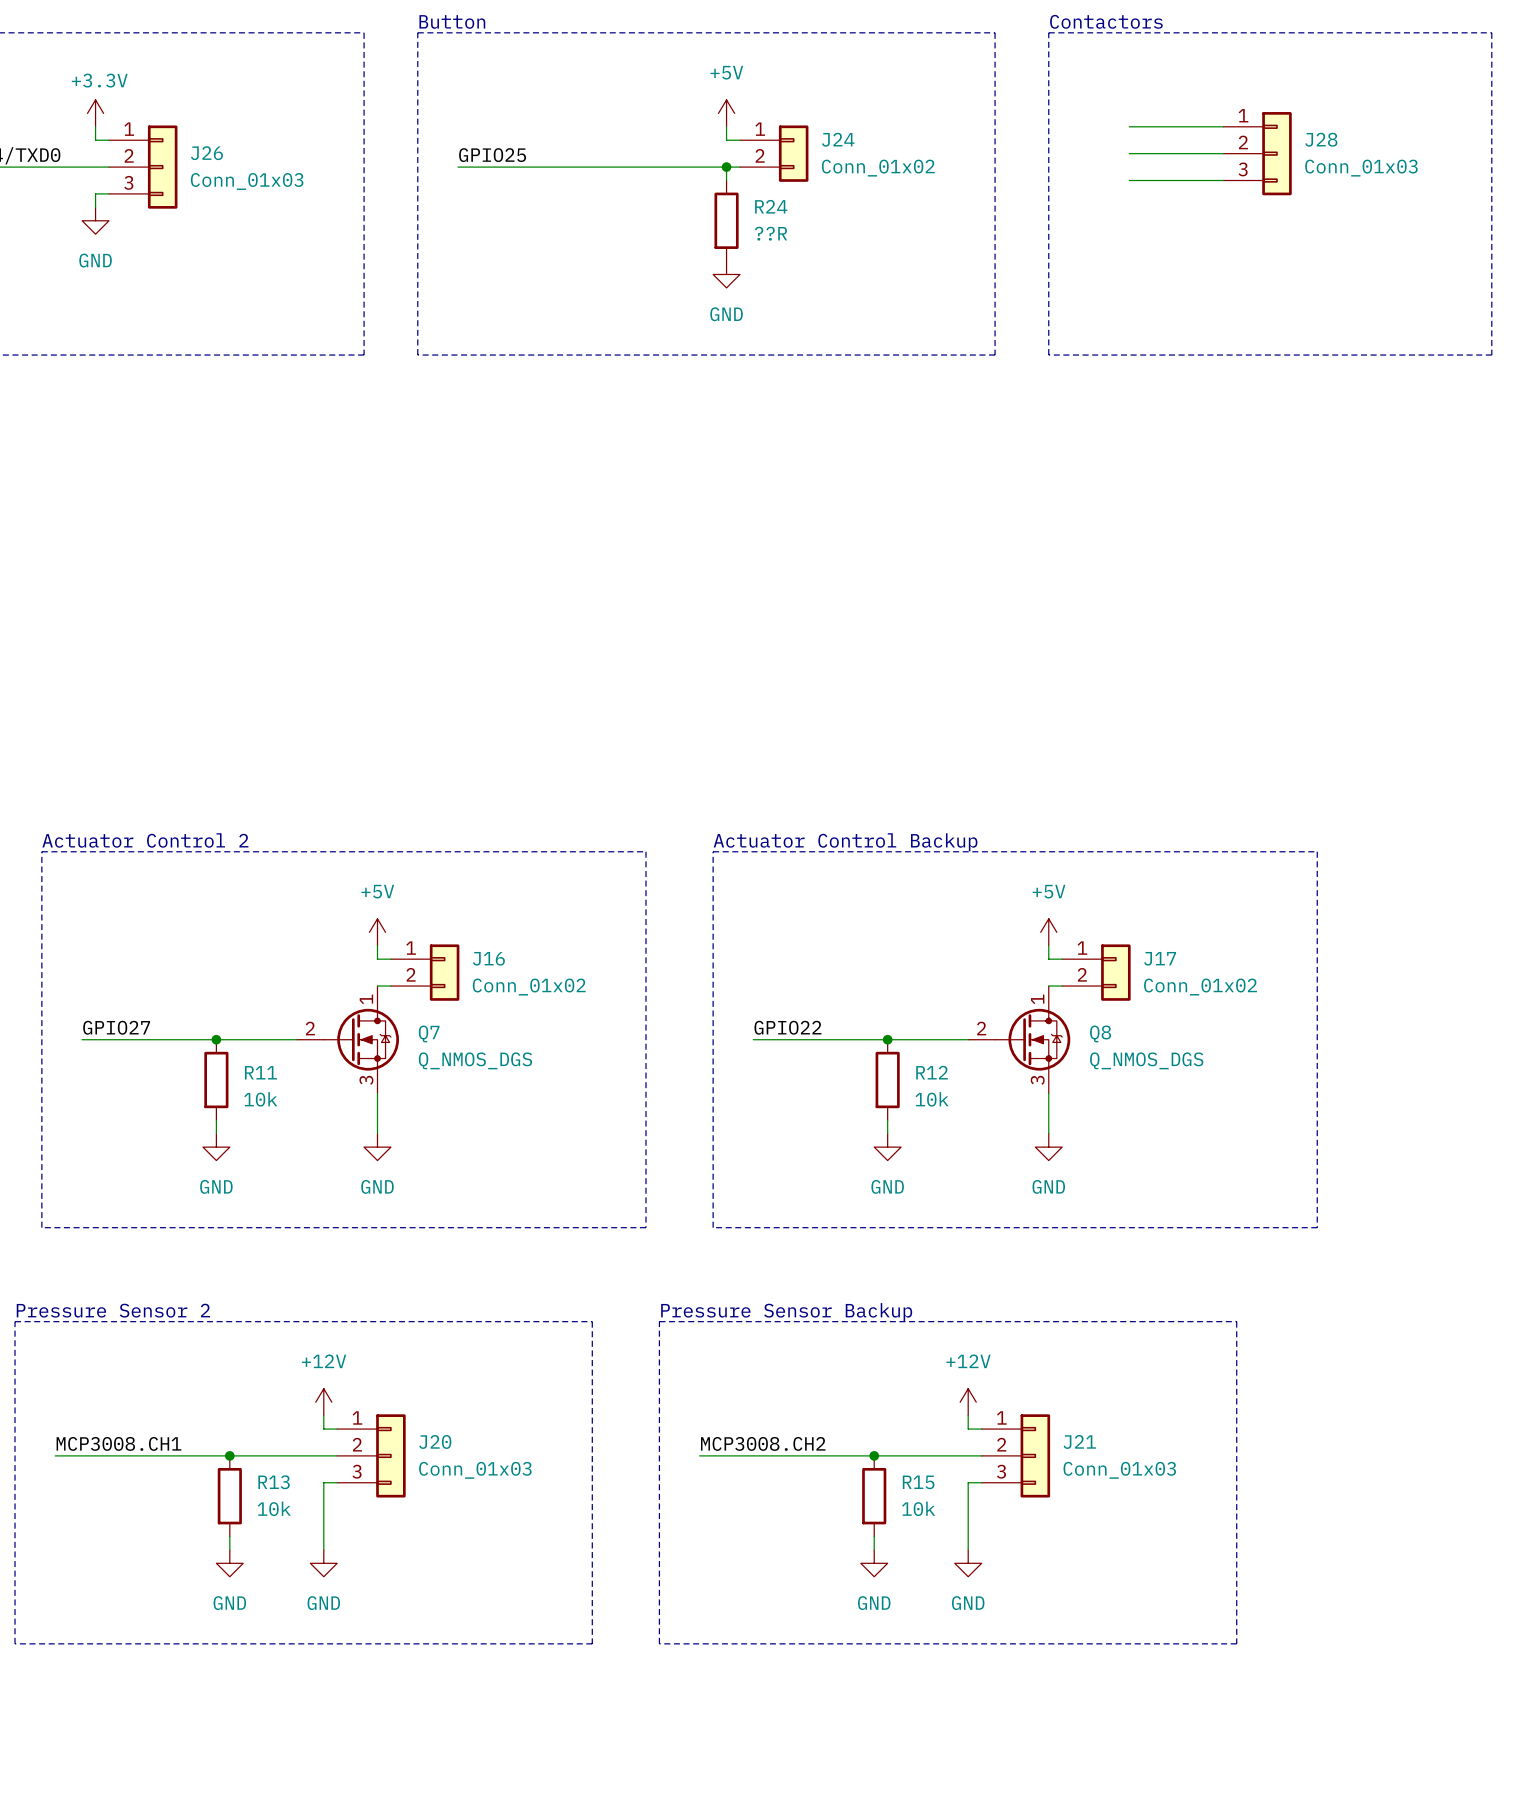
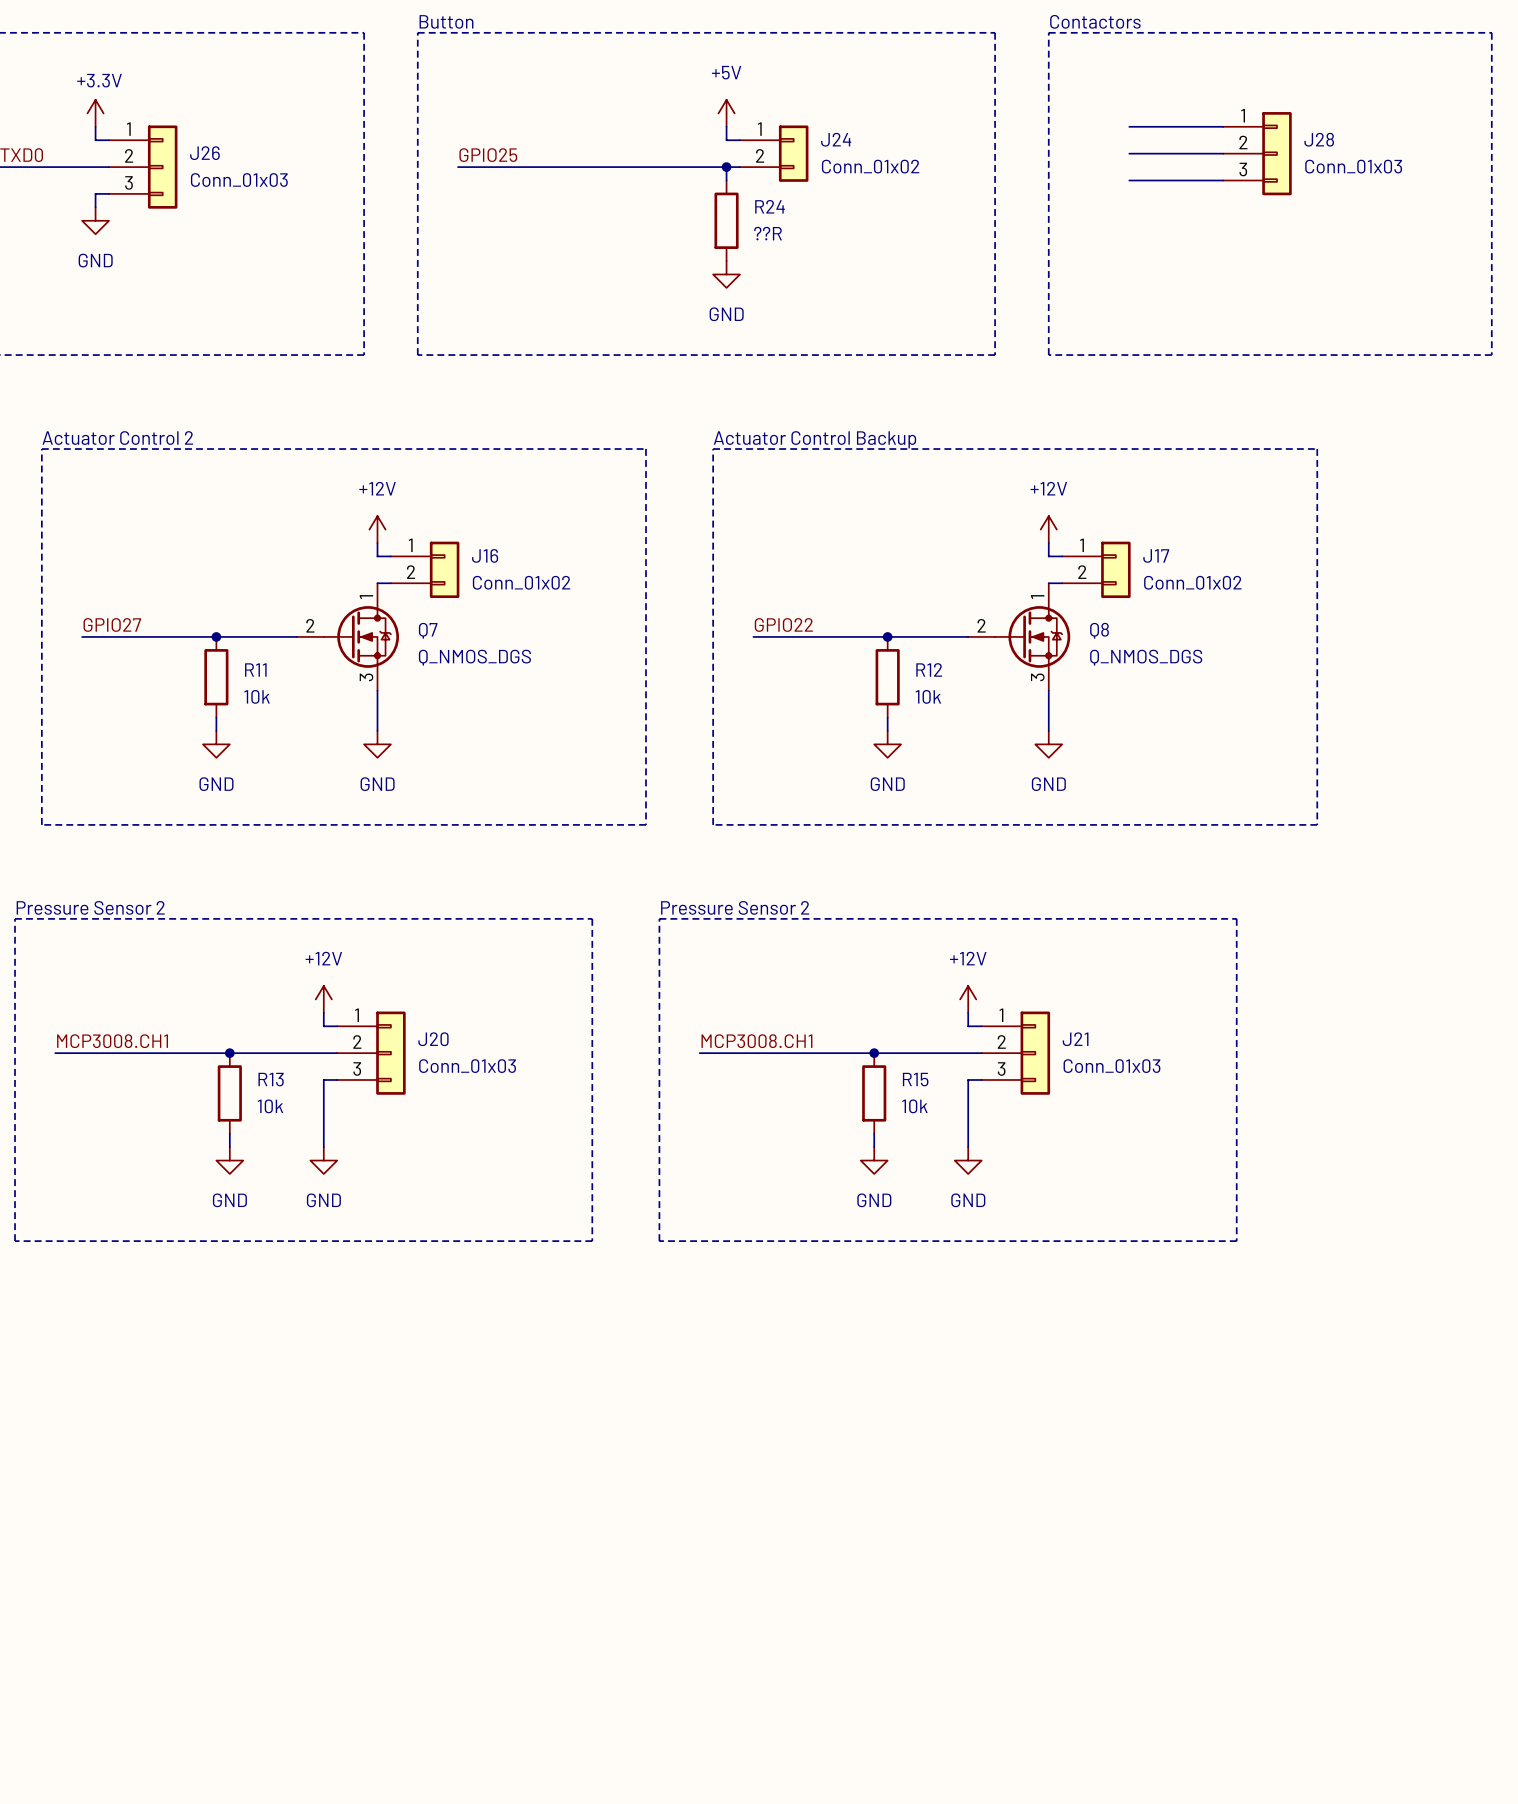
text: none -> Actuator Control 2 (117, 438)
text: none -> Actuator Control Backup (814, 439)
line: none -> (41, 449) (646, 449) (646, 824) (41, 824) (41, 449)
line: none -> (713, 449) (1317, 449) (1317, 824) (713, 824) (713, 449)
power symbol: none -> +12V (377, 529)
power symbol: none -> +12V (1048, 529)
wire: none -> (377, 542) (377, 556) (390, 556)
wire: none -> (1048, 542) (1048, 556) (1062, 556)
wire: none -> (377, 583) (390, 583)
wire: none -> (1048, 583) (1062, 583)
label: none -> GPIO27 (112, 624)
label: none -> GPIO22 (783, 624)
wire: none -> (82, 636) (296, 636)
junction: none -> (216, 636)
wire: none -> (753, 636) (968, 636)
junction: none -> (887, 636)
wire: none -> (377, 690) (377, 730)
wire: none -> (1048, 690) (1048, 730)
wire: none -> (216, 717) (216, 730)
wire: none -> (887, 717) (887, 730)
power symbol: none -> GND (216, 744)
power symbol: none -> GND (377, 744)
power symbol: none -> GND (887, 744)
power symbol: none -> GND (1048, 744)
text: Actuator Control 2 (145, 840) -> none
text: Actuator Control Backup (845, 842) -> none
line: (41, 851) (646, 851) (646, 1227) (41, 1227) (41, 851) -> (15, 918) (15, 1241) (592, 1241) (592, 918) (15, 918)
line: (713, 851) (1317, 851) (1317, 1227) (713, 1227) (713, 851) -> (659, 918) (659, 1241) (1236, 1241) (1236, 918) (659, 918)
text: none -> Pressure Sensor 2 (90, 907)
text: none -> Pressure Sensor 2 (735, 907)
power symbol: +5V (377, 932) -> none
power symbol: +5V (1048, 932) -> none
wire: (377, 945) (377, 959) (390, 959) -> (323, 1012) (323, 1026) (337, 1026)
wire: (1048, 945) (1048, 959) (1062, 959) -> (968, 1012) (968, 1026) (981, 1026)
J16 position: (425, 972) -> (425, 569)
J17 position: (1096, 972) -> (1096, 569)
wire: (377, 986) (390, 986) -> none
wire: (1048, 986) (1062, 986) -> none
power symbol: none -> +12V (323, 999)
power symbol: none -> +12V (968, 999)
label: GPIO27 (116, 1027) -> none
label: GPIO22 (787, 1027) -> none
wire: (82, 1039) (296, 1039) -> none
junction position: (216, 1039) -> (229, 1053)
Q7 position: (347, 1039) -> (347, 636)
wire: (753, 1039) (968, 1039) -> none
junction position: (887, 1039) -> (874, 1053)
Q8 position: (1019, 1039) -> (1019, 636)
label: none -> MCP3008.CH1 (112, 1041)
label: none -> MCP3008.CH1 (756, 1041)
wire: none -> (55, 1053) (337, 1053)
wire: none -> (699, 1053) (981, 1053)
R11 position: (216, 1080) -> (216, 677)
wire: none -> (337, 1080) (323, 1080) (323, 1147)
R12 position: (887, 1080) -> (887, 677)
wire: none -> (981, 1080) (968, 1080) (968, 1147)
wire: (377, 1093) (377, 1133) -> none
wire: (1048, 1093) (1048, 1133) -> none
wire: (216, 1120) (216, 1133) -> (229, 1133) (229, 1147)
wire: (887, 1120) (887, 1133) -> (874, 1133) (874, 1147)
power symbol position: GND (216, 1147) -> GND (229, 1160)
power symbol: GND (377, 1147) -> none
power symbol position: GND (887, 1147) -> GND (874, 1160)
power symbol: GND (1048, 1147) -> none
power symbol: none -> GND (323, 1160)
power symbol: none -> GND (968, 1160)
text: Pressure Sensor 2 (113, 1310) -> none
text: Pressure Sensor Backup (786, 1312) -> none
line: (15, 1321) (592, 1321) (592, 1643) (15, 1643) (15, 1321) -> none
line: (659, 1321) (1236, 1321) (1236, 1643) (659, 1643) (659, 1321) -> none
power symbol: +12V (323, 1402) -> none
power symbol: +12V (968, 1402) -> none
wire: (323, 1415) (323, 1429) (337, 1429) -> none
wire: (968, 1415) (968, 1429) (981, 1429) -> none
label: MCP3008.CH1 (118, 1443) -> none
label: MCP3008.CH2 (763, 1443) -> none
wire: (55, 1455) (337, 1455) -> none
junction: (229, 1455) -> none
J20 position: (371, 1455) -> (371, 1053)
wire: (699, 1455) (981, 1455) -> none
junction: (874, 1455) -> none
J21 position: (1015, 1455) -> (1015, 1053)
wire: (337, 1482) (323, 1482) (323, 1549) -> none
wire: (981, 1482) (968, 1482) (968, 1549) -> none
R13 position: (229, 1496) -> (229, 1093)
R15 position: (874, 1496) -> (874, 1093)
wire: (229, 1536) (229, 1549) -> none
wire: (874, 1536) (874, 1549) -> none
power symbol: GND (229, 1563) -> none
power symbol: GND (323, 1563) -> none
power symbol: GND (874, 1563) -> none
power symbol: GND (968, 1563) -> none

